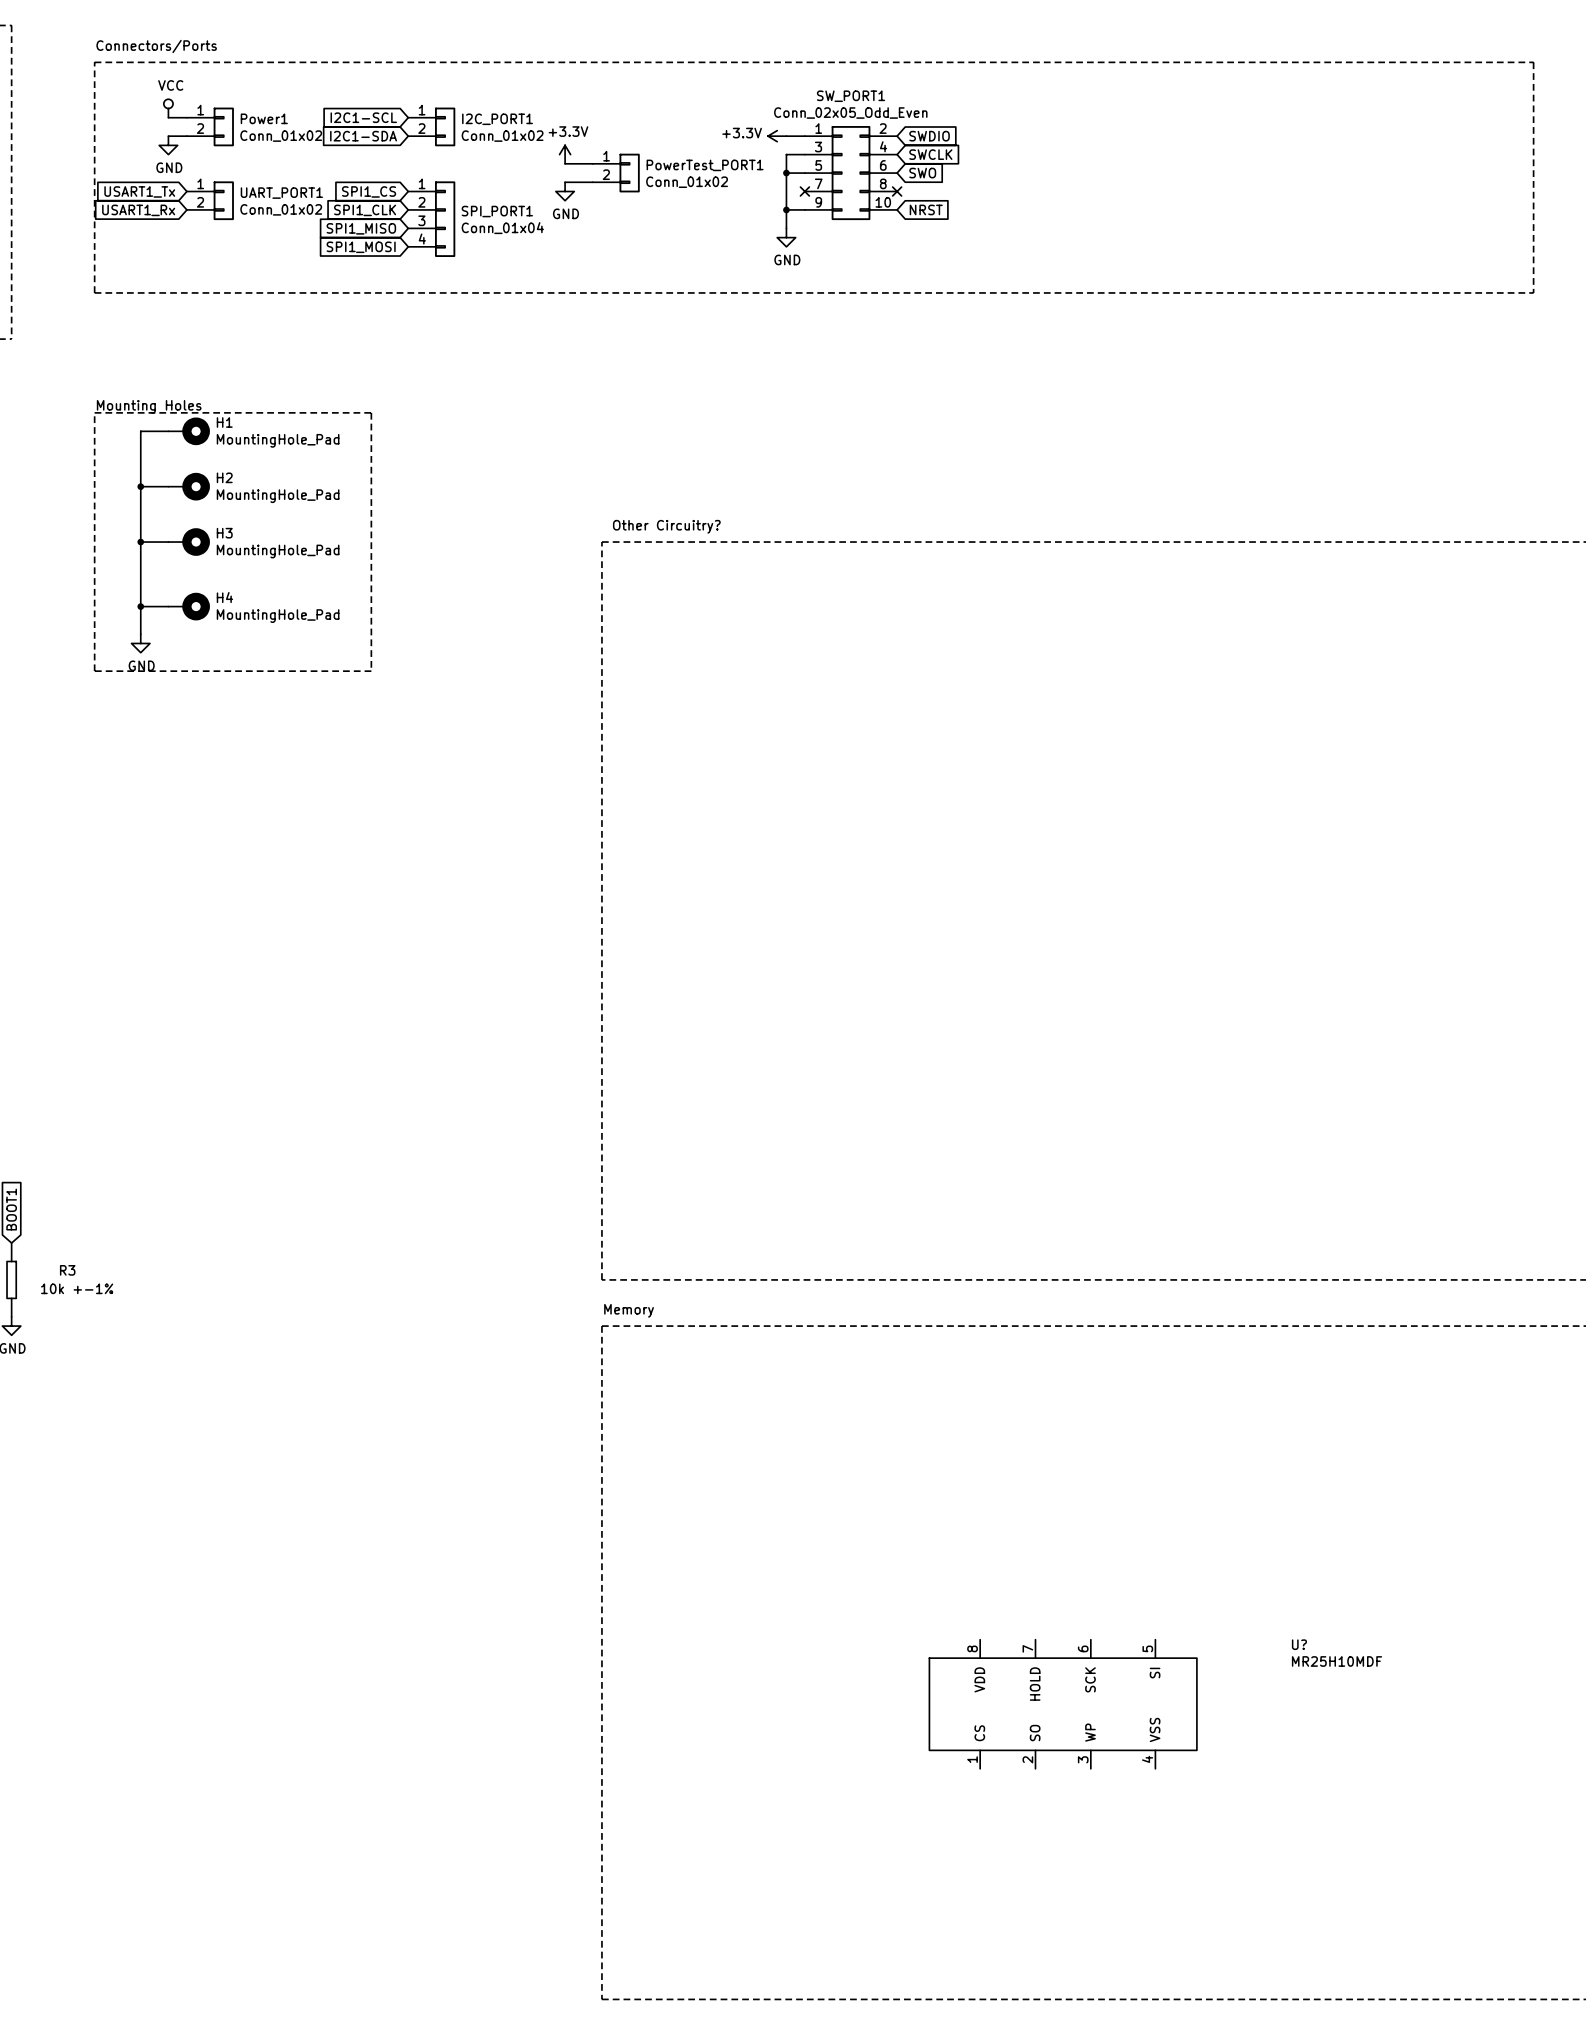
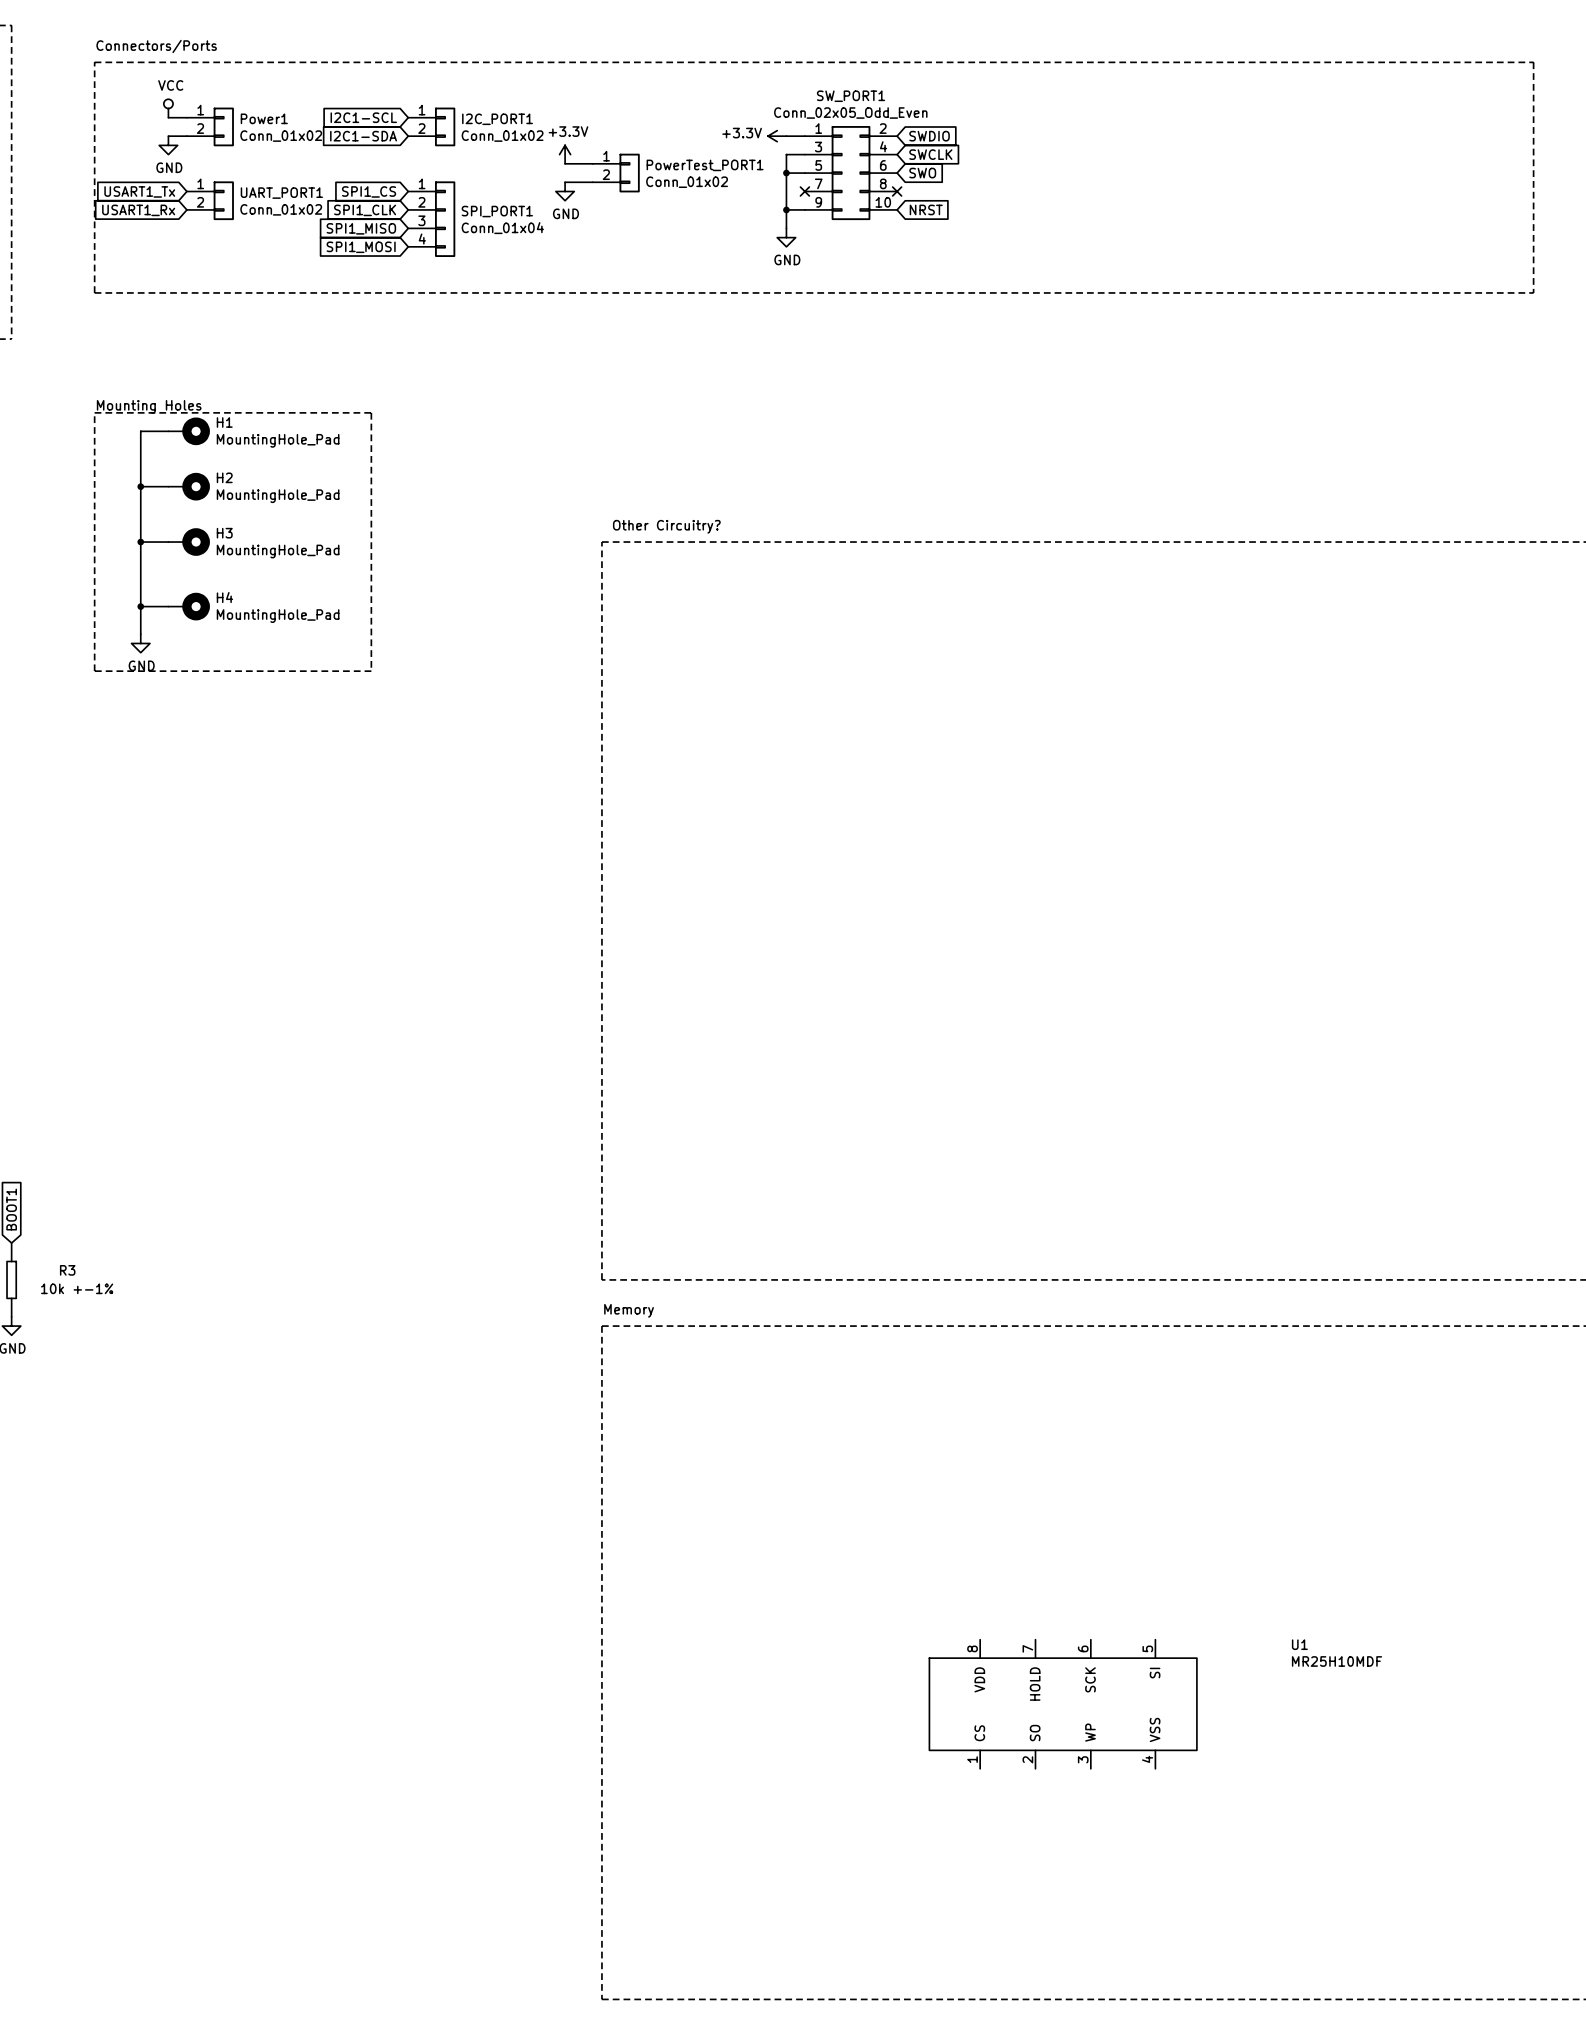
U? name: U? (1299, 1644) -> U1 (1299, 1644)

